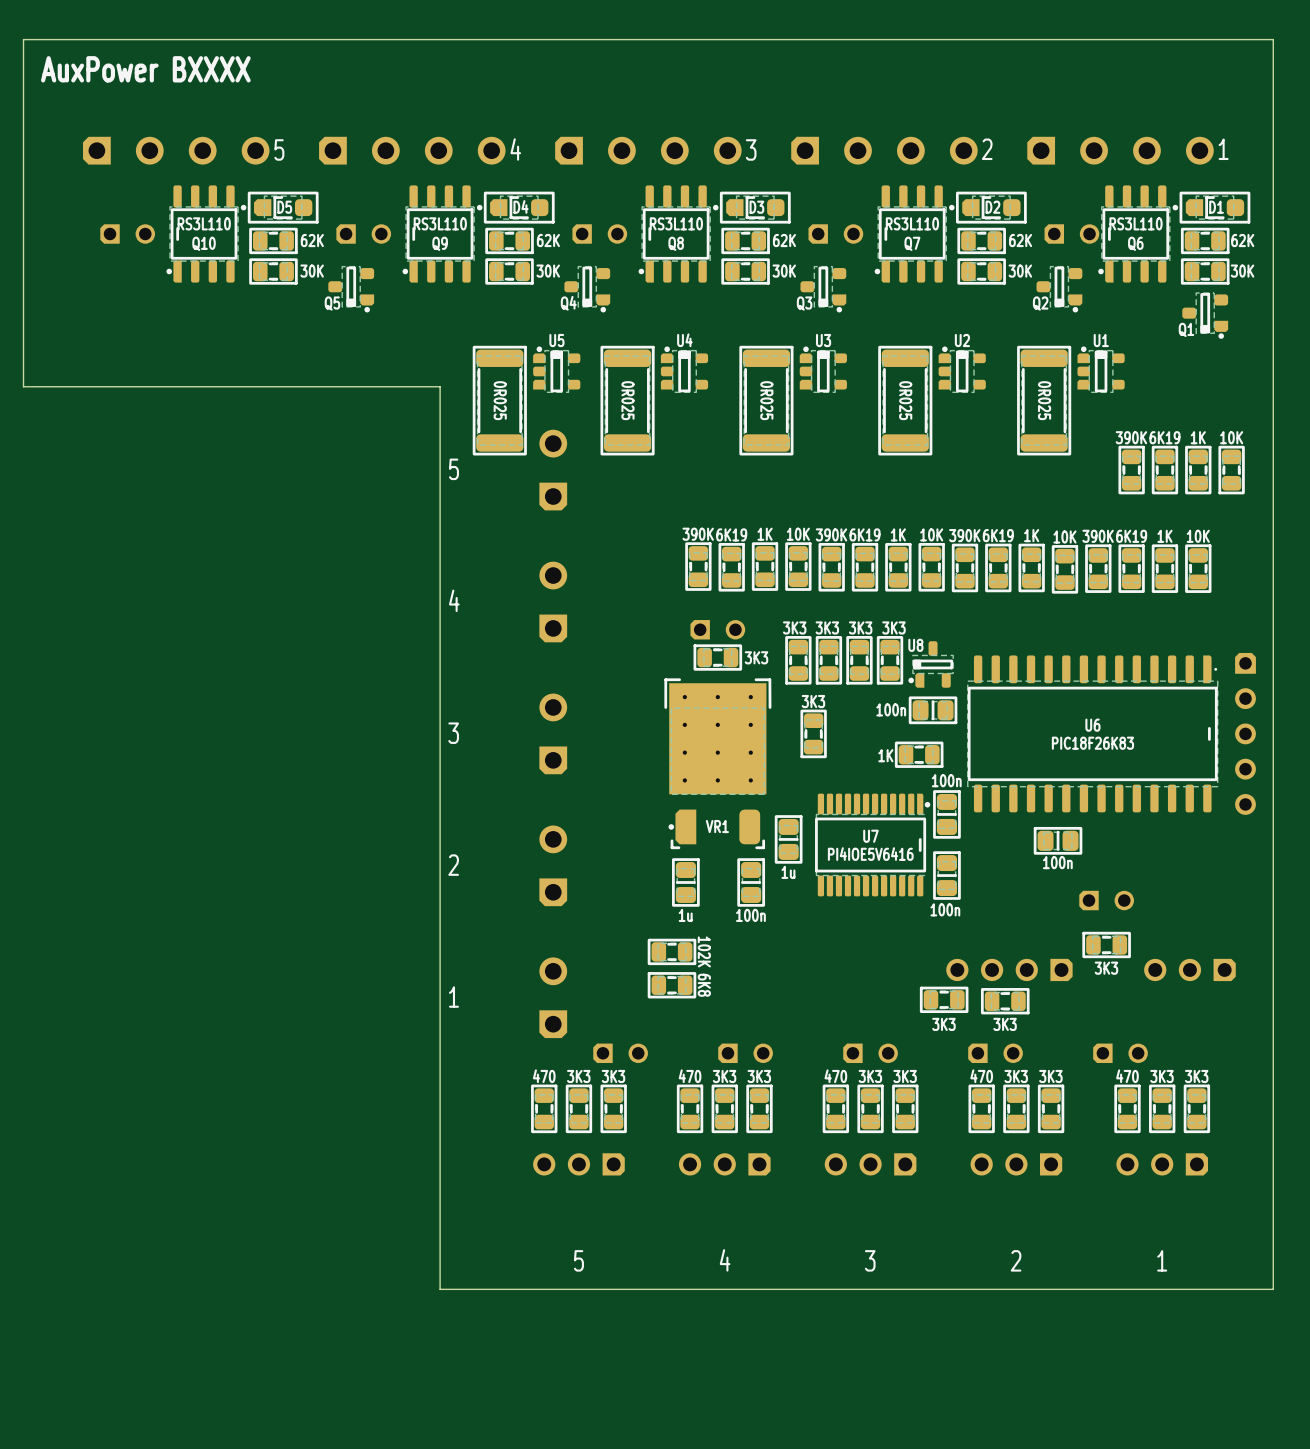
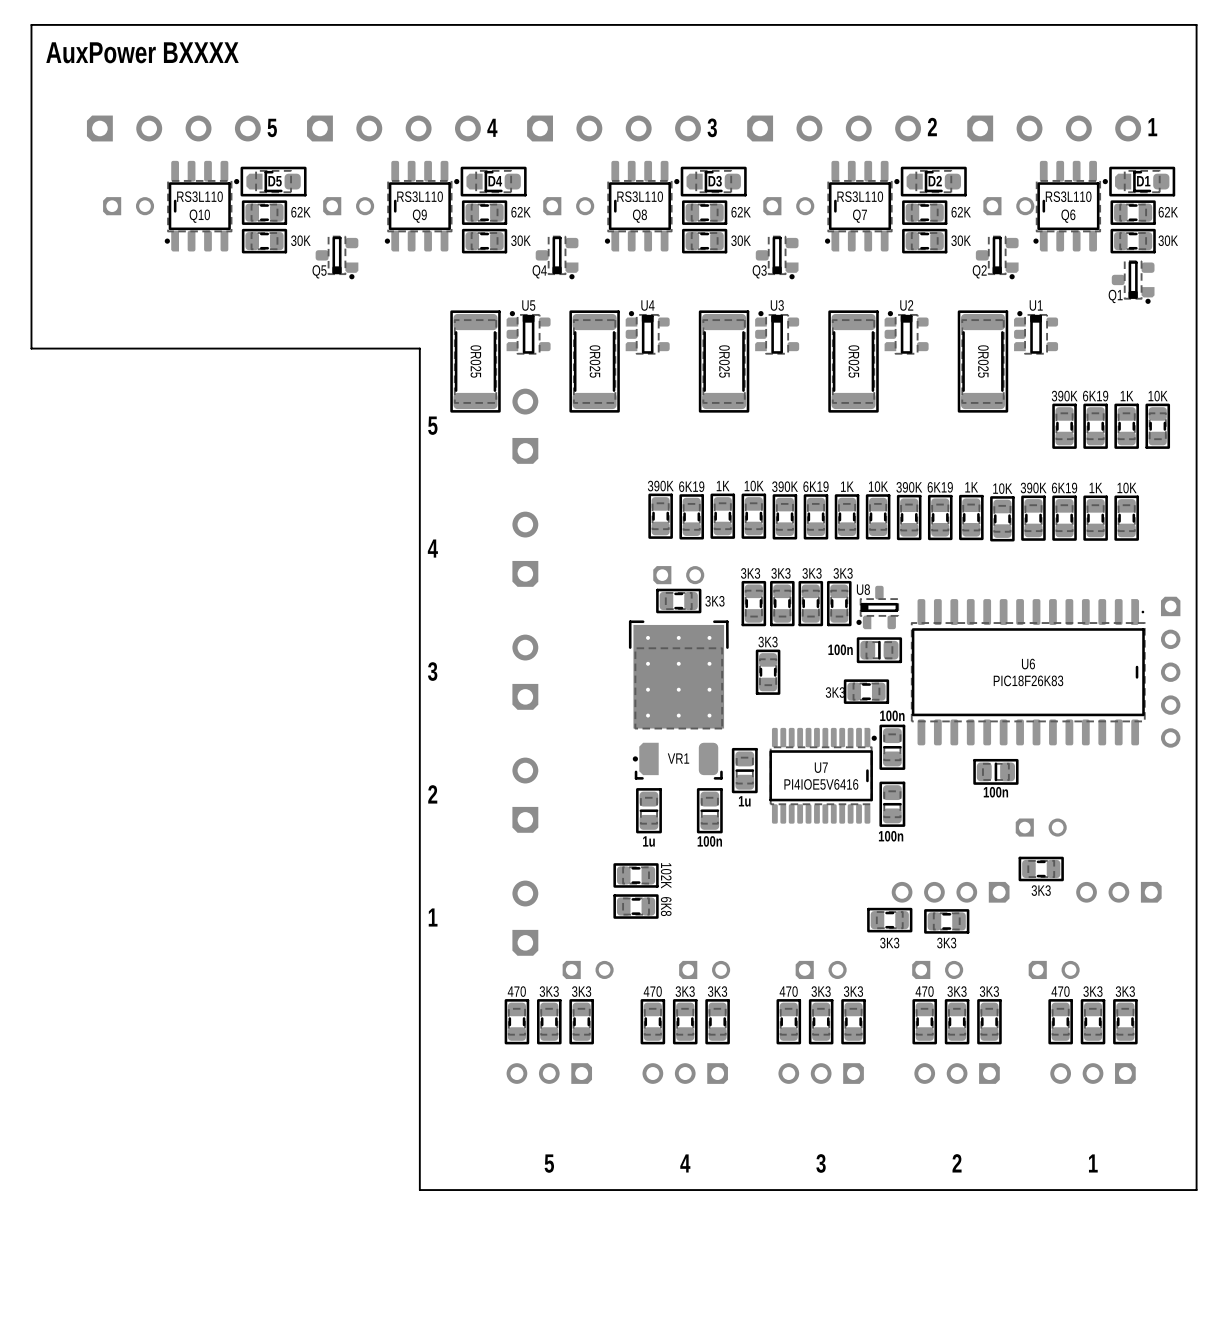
part value: 1K (885, 755) -> 3K3 (835, 692)

